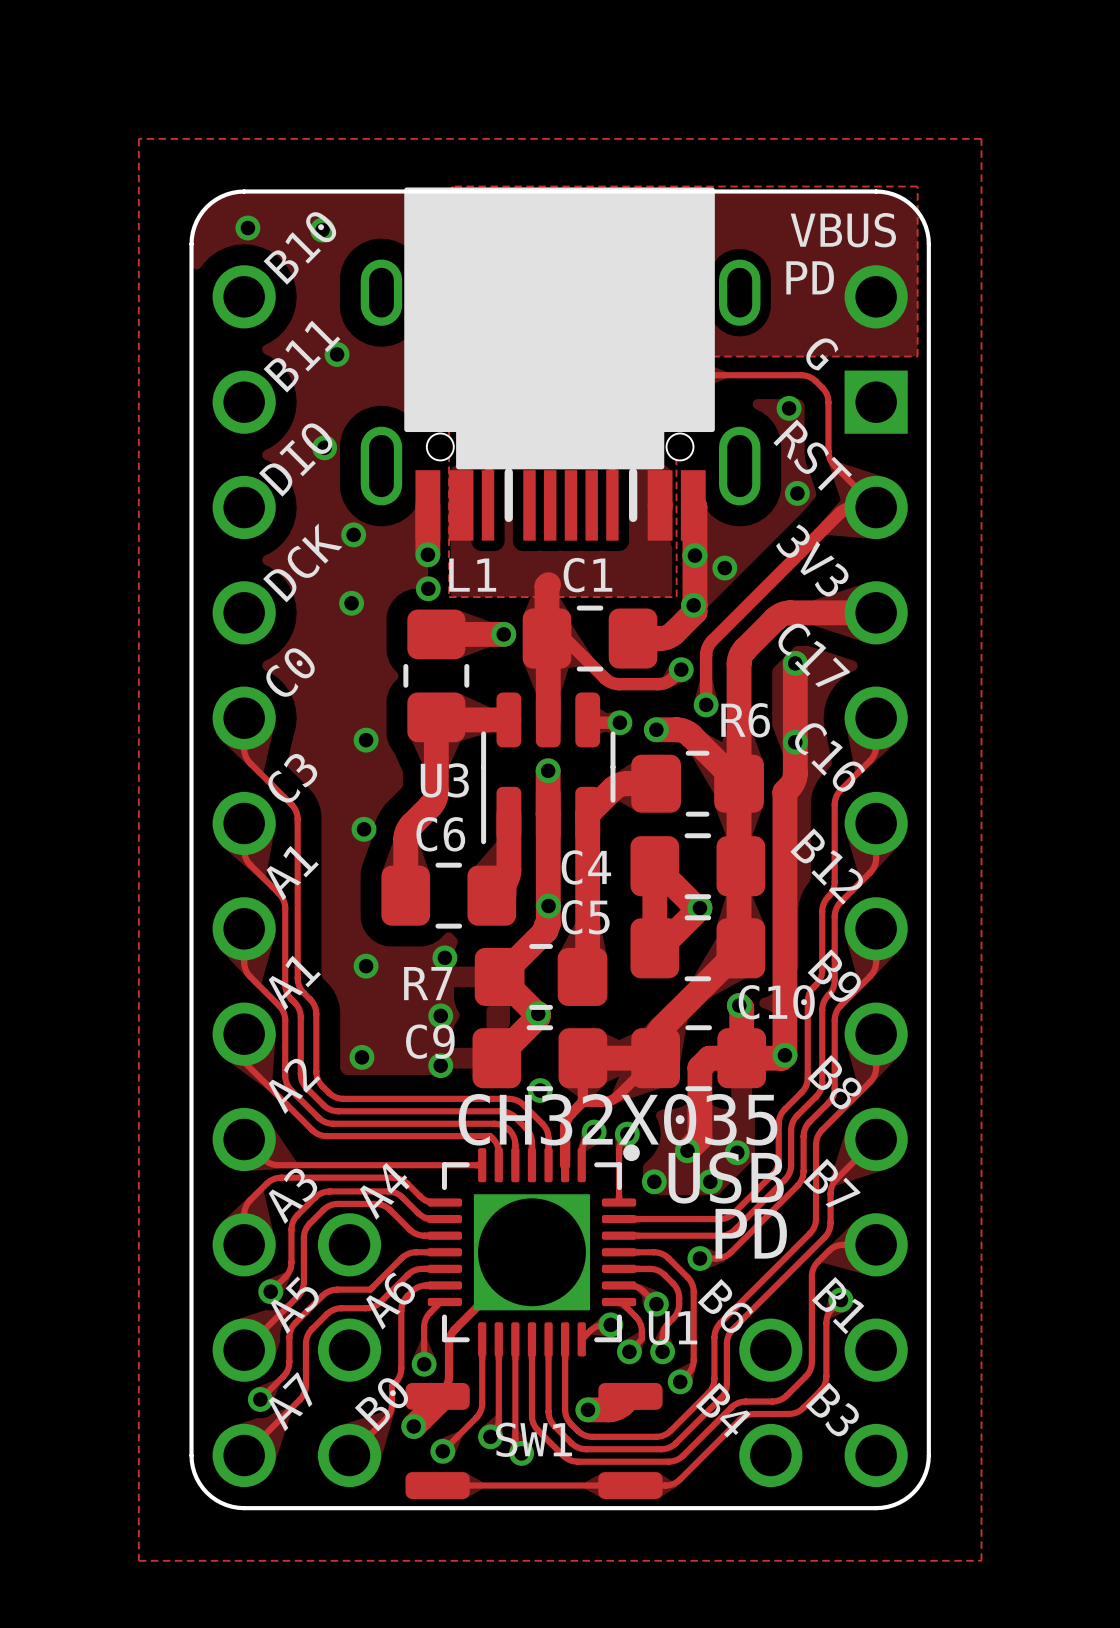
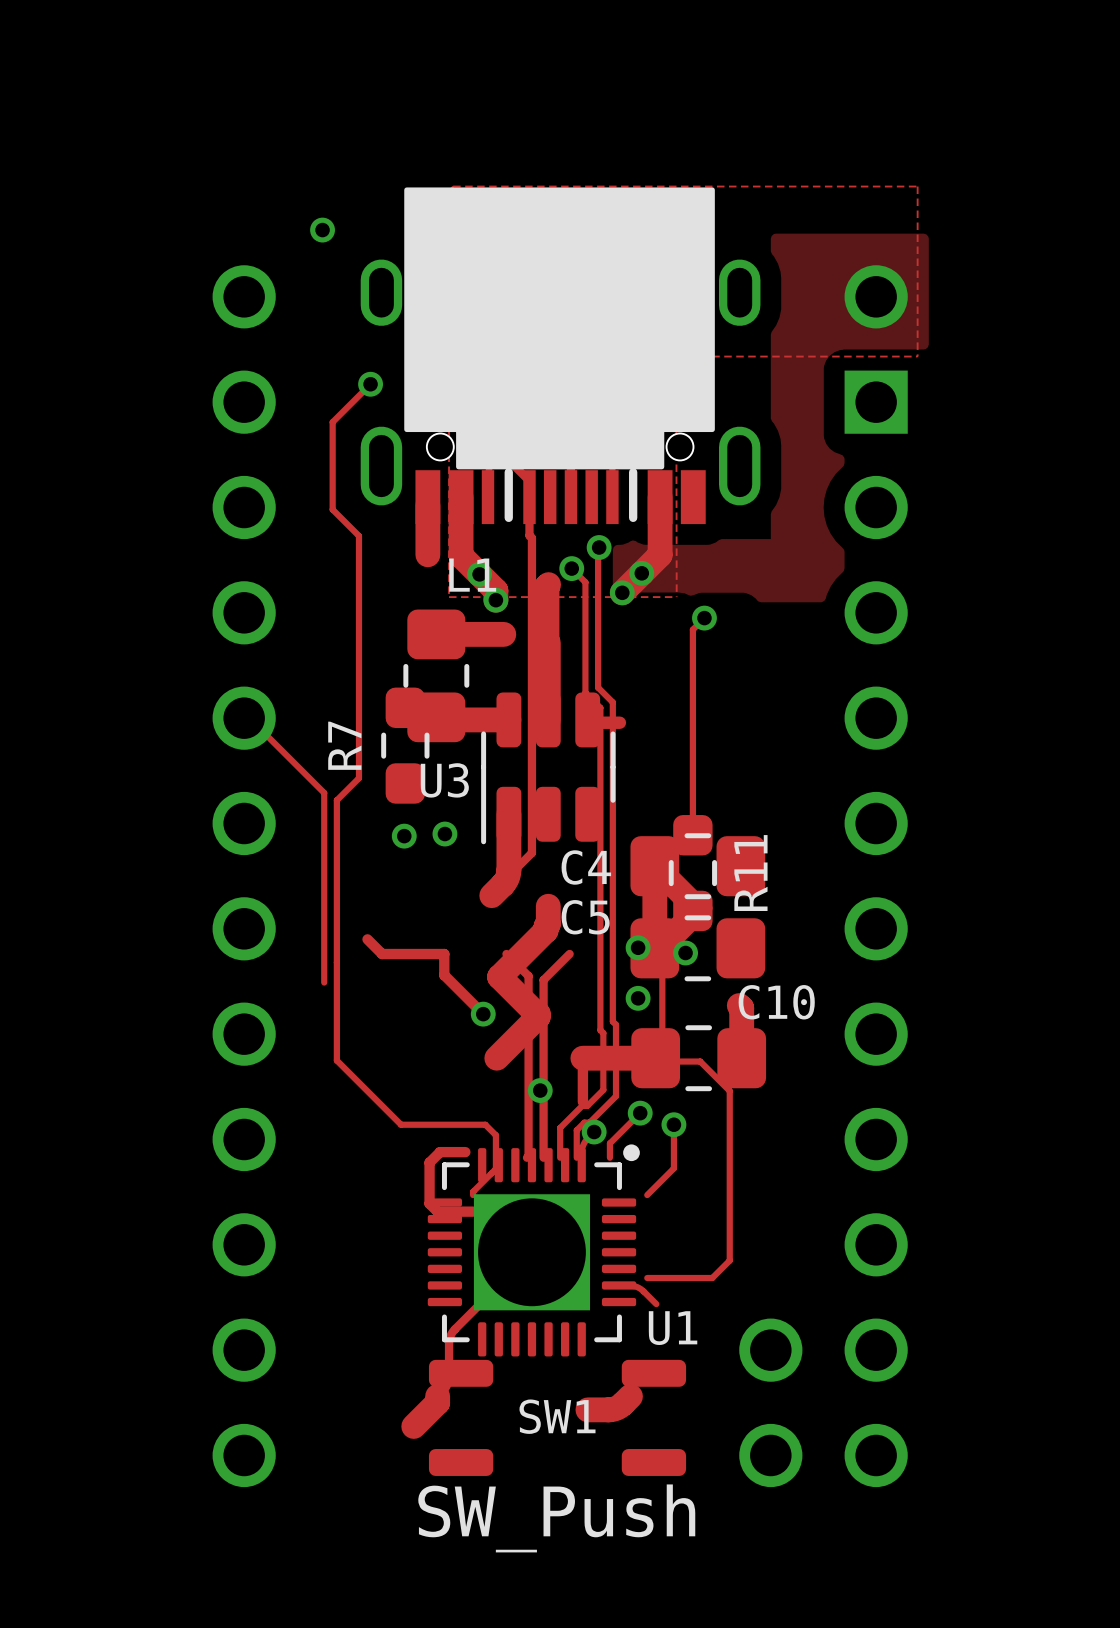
zone outline: (138, 138) (138, 1560) (981, 1560) (981, 138) (138, 138) -> none
part footprint: [360, 187, 761, 541] -> [360, 187, 761, 525]
board edge: (244, 191) (876, 191) (893, 194) (904, 199) (917, 211) (923, 221) (928, 244) (928, 1455) (927, 1467) (920, 1483) (913, 1492) (899, 1502) (876, 1508) (244, 1508) (232, 1506) (216, 1500) (206, 1492) (196, 1478) (191, 1455) (191, 244) (196, 221) (206, 206) (221, 196) (244, 191) -> none
via: (247, 228) -> none
text: VBUS (843, 230) -> none
text: B10 (300, 248) -> none
text: PD (810, 277) -> none
via: (337, 354) -> none
text: G (821, 354) -> none
text: B11 (301, 356) -> none
track: (701, 375) (801, 375) (813, 379) (823, 389) (828, 398) (830, 459) (876, 507) (851, 507) (841, 511) (710, 642) (706, 653) (706, 704) -> none
track: none -> (371, 383) (332, 422) (332, 509) (358, 535) (358, 778) (336, 800) (336, 1060) (401, 1124) (485, 1124) (495, 1135) (495, 1168) (473, 1191) (473, 1195)
via: none -> (370, 384)
via: (789, 408) -> none
track: none -> (513, 440) (513, 465) (529, 481) (529, 535) (531, 538) (531, 852) (506, 878)
via: (324, 447) -> none
text: RST (812, 455) -> none
text: DIO (296, 459) -> none
via: (797, 493) -> none
track: none -> (461, 497) (461, 555) (495, 590) (495, 600)
track: none -> (660, 497) (660, 555) (622, 592)
track: (693, 505) (694, 507) (694, 612) (667, 636) (633, 638) -> none
via: (353, 534) -> none
track: none -> (599, 547) (598, 687) (612, 702) (612, 1021) (615, 1024) (615, 1096) (589, 1122) (584, 1122) (576, 1130) (576, 1157)
via: none -> (599, 547)
via: (427, 554) -> none
via: (694, 555) -> none
text: 3V3 (812, 560) -> none
text: DCK (302, 562) -> none
track: none -> (571, 568) (585, 582) (585, 692) (600, 707) (600, 1030) (603, 1033) (603, 1089) (587, 1105) (582, 1105) (560, 1127) (560, 1157)
via: none -> (571, 568)
via: (724, 568) -> none
via: none -> (641, 573)
via: none -> (479, 574)
via: (428, 588) -> none
via: none -> (622, 592)
via: none -> (495, 600)
via: (351, 603) -> none
via position: (693, 605) -> (704, 618)
track: (876, 612) (784, 613) (775, 618) (740, 656) (739, 663) (739, 947) -> none
track: none -> (704, 618) (692, 629) (692, 835)
via: (503, 634) -> none
track: (565, 638) (604, 678) (613, 683) (663, 683) (670, 679) (681, 669) -> none
C1: (590, 638) -> none
text: C17 (814, 655) -> none
track: (795, 663) (795, 775) (791, 784) (784, 791) (784, 1055) (782, 1058) (709, 1058) (699, 1067) (699, 1138) (687, 1150) -> none
via: (795, 663) -> none
via: (681, 669) -> none
text: C0 (290, 672) -> none
via: (706, 704) -> none
track: (436, 717) (435, 795) (431, 804) (410, 826) (406, 834) (405, 895) -> none
track: (244, 718) (244, 750) (246, 758) (291, 804) (296, 813) (297, 980) (301, 989) (312, 1001) (315, 1008) (316, 1073) (319, 1083) (330, 1094) (340, 1098) (516, 1100) (542, 1123) (546, 1130) (548, 1165) -> (244, 718) (246, 715) (324, 792) (324, 982)
track: (876, 718) (875, 748) (873, 756) (839, 791) (835, 798) (834, 884) (828, 896) -> none
via: (619, 722) -> none
track: (656, 729) (678, 729) (688, 733) (739, 783) -> none
via: (656, 729) -> none
via: (366, 740) -> none
via: (795, 742) -> none
text: C16 (829, 757) -> none
via: (548, 770) -> none
text: C3 (292, 778) -> none
track: (656, 783) (618, 785) (587, 814) (587, 971) -> none
R6: (697, 783) -> none
track: (244, 823) (244, 852) (246, 859) (279, 893) (284, 903) (285, 986) (287, 994) (300, 1011) (300, 1075) (305, 1086) (325, 1107) (335, 1111) (506, 1112) (515, 1117) (530, 1134) (531, 1165) -> none
track: (876, 823) (874, 865) (839, 903) (835, 912) (834, 983) (822, 1007) (822, 1084) (817, 1094) (792, 1122) (790, 1167) (788, 1175) (735, 1229) (726, 1234) (619, 1235) -> none
via: (364, 829) -> none
via: none -> (444, 834)
via: none -> (404, 836)
track: none -> (661, 857) (662, 1033) (648, 1046) (648, 1058) (651, 1061) (700, 1061) (729, 1091) (729, 1260) (712, 1278) (647, 1278)
text: B12 (826, 866) -> none
text: A1 (292, 873) -> none
R11: none -> (692, 873)
C6: (448, 895) -> none
track: (828, 896) (822, 909) (821, 975) (810, 991) (807, 999) (807, 1080) (803, 1090) (783, 1110) (779, 1118) (778, 1162) (775, 1170) (734, 1213) (725, 1218) (619, 1219) -> none
via: (548, 906) -> none
via: (699, 908) -> none
track: (244, 928) (245, 970) (280, 1007) (284, 1014) (286, 1083) (320, 1119) (333, 1123) (499, 1124) (509, 1129) (513, 1136) (515, 1165) -> none
track: (876, 928) (874, 969) (839, 1007) (835, 1014) (833, 1093) (830, 1100) (805, 1128) (803, 1173) (800, 1181) (729, 1253) (720, 1258) (699, 1258) -> none
track: none -> (367, 939) (382, 954) (444, 954) (444, 975) (483, 1014)
R7 footprint: [474, 943, 608, 1010] -> [381, 687, 430, 804]
via: none -> (638, 947)
track: (740, 948) (659, 1030) (655, 1039) (655, 1058) (618, 1095) (607, 1101) (582, 1101) (569, 1115) (565, 1126) (565, 1165) -> none
track: none -> (569, 953) (543, 980) (543, 1157)
via: none -> (685, 953)
track: none -> (506, 954) (528, 976) (528, 1156) (526, 1157)
via: (444, 957) -> none
via: (366, 966) -> none
text: B9 (834, 975) -> none
text: A1 (294, 983) -> none
via: none -> (638, 998)
via: (739, 1005) -> none
via: (538, 1013) -> none
via: none -> (483, 1014)
via: (440, 1015) -> none
track: (876, 1034) (876, 1067) (873, 1077) (822, 1130) (816, 1138) (816, 1218) (813, 1229) (717, 1326) (714, 1335) (712, 1386) (670, 1430) (664, 1435) (656, 1436) (592, 1436) (579, 1432) (569, 1422) (565, 1413) (565, 1339) -> none
via: (784, 1055) -> none
via: (361, 1057) -> none
C9: (539, 1058) -> none
track: (244, 1061) (319, 1134) (326, 1136) (490, 1136) (497, 1147) (498, 1165) -> none
via: (440, 1065) -> none
text: B8 (834, 1082) -> none
text: A2 (294, 1086) -> none
track: none -> (640, 1113) (609, 1143) (609, 1157)
text: CH32X035 (618, 1119) -> none
track: none -> (673, 1124) (673, 1168) (647, 1195)
via: none -> (673, 1124)
track: (627, 1134) (621, 1141) (619, 1148) (619, 1202) -> none
via position: (627, 1134) -> (640, 1113)
track: (244, 1139) (265, 1160) (276, 1165) (482, 1165) -> none
track: (876, 1139) (833, 1183) (830, 1191) (830, 1225) (826, 1235) (730, 1332) (726, 1341) (726, 1383) (724, 1393) (672, 1445) (661, 1449) (586, 1449) (573, 1444) (553, 1424) (548, 1415) (548, 1339) -> none
via: (687, 1150) -> none
track: none -> (465, 1152) (440, 1152) (429, 1162) (429, 1203) (437, 1211) (473, 1211)
via: (737, 1152) -> none
text: USB (726, 1177) -> none
via: (654, 1181) -> none
via: (710, 1181) -> none
text: B7 (832, 1183) -> none
text: A4 (384, 1191) -> none
text: A3 (293, 1196) -> none
track: (444, 1202) (425, 1200) (405, 1181) (395, 1177) (277, 1178) (268, 1182) (246, 1204) (244, 1212) (244, 1244) -> none
track: (444, 1219) (430, 1218) (422, 1216) (401, 1196) (391, 1191) (321, 1193) (293, 1220) (291, 1227) (290, 1268) (286, 1275) (270, 1291) -> none
text: PD (751, 1233) -> none
track: (444, 1235) (416, 1234) (388, 1208) (381, 1204) (338, 1203) (328, 1206) (309, 1223) (304, 1232) (303, 1283) (301, 1291) (244, 1350) -> none
track: (876, 1244) (835, 1246) (814, 1266) (811, 1276) (811, 1364) (805, 1376) (780, 1400) (743, 1401) (735, 1404) (683, 1455) (674, 1460) (577, 1461) (565, 1457) (538, 1430) (532, 1421) (531, 1339) -> none
track: (444, 1252) (414, 1252) (406, 1254) (370, 1289) (334, 1289) (324, 1293) (292, 1326) (289, 1335) (287, 1369) (260, 1399) -> none
track: (619, 1252) (661, 1253) (668, 1258) (692, 1284) (693, 1362) (689, 1372) (680, 1381) -> none
via: (699, 1258) -> none
track: (444, 1268) (420, 1268) (412, 1271) (373, 1306) (337, 1308) (326, 1314) (310, 1331) (306, 1338) (305, 1387) (303, 1394) (244, 1455) -> none
track: (619, 1268) (655, 1269) (662, 1273) (676, 1288) (679, 1296) (678, 1309) (664, 1329) (662, 1351) -> none
track: (444, 1285) (418, 1287) (404, 1300) (401, 1310) (401, 1370) (398, 1377) (392, 1386) (391, 1410) (385, 1419) (349, 1455) -> none
via: (270, 1291) -> none
track: (840, 1299) (829, 1311) (826, 1319) (826, 1379) (820, 1391) (801, 1409) (794, 1413) (751, 1414) (743, 1416) (673, 1483) (665, 1485) (437, 1485) -> none
via: (840, 1299) -> none
text: A6 (390, 1301) -> none
track: (440, 1302) (428, 1314) (425, 1321) (424, 1364) -> none
track: (621, 1302) (637, 1318) (641, 1328) (641, 1339) (629, 1351) -> none
via: (656, 1304) -> none
text: A5 (294, 1305) -> none
text: B1 (838, 1305) -> none
text: B6 (725, 1306) -> none
track: (610, 1324) (595, 1327) (581, 1339) -> none
via: (610, 1324) -> none
track: (482, 1339) (480, 1411) (442, 1451) -> none
track: (498, 1339) (498, 1421) (496, 1429) (490, 1436) -> none
track: (515, 1339) (515, 1438) (516, 1446) (521, 1453) -> none
part: (349, 1350) -> none
via: (629, 1351) -> none
via: (662, 1351) -> none
via: (424, 1364) -> none
via: (680, 1381) -> none
via: (260, 1399) -> none
text: A7 (290, 1401) -> none
text: B0 (381, 1404) -> none
via: (587, 1409) -> none
text: B3 (832, 1409) -> none
text: B4 (723, 1410) -> none
via: (413, 1426) -> none
via: (490, 1436) -> none
SW1 position: (534, 1440) -> (557, 1417)
via: (442, 1451) -> none
via: (521, 1453) -> none
SW1 value: none -> SW_Push (556, 1518)

